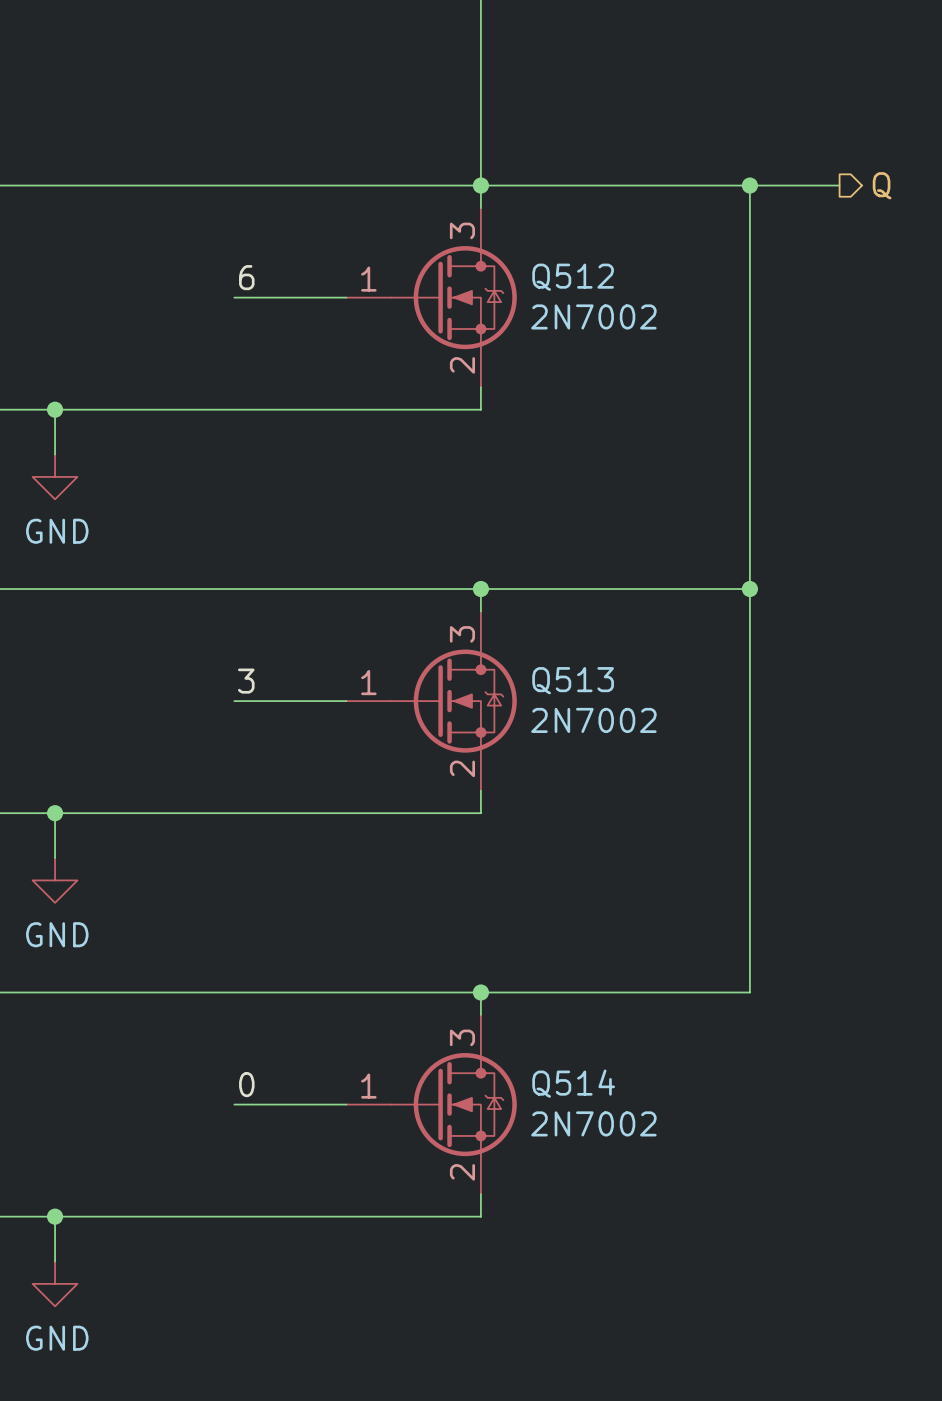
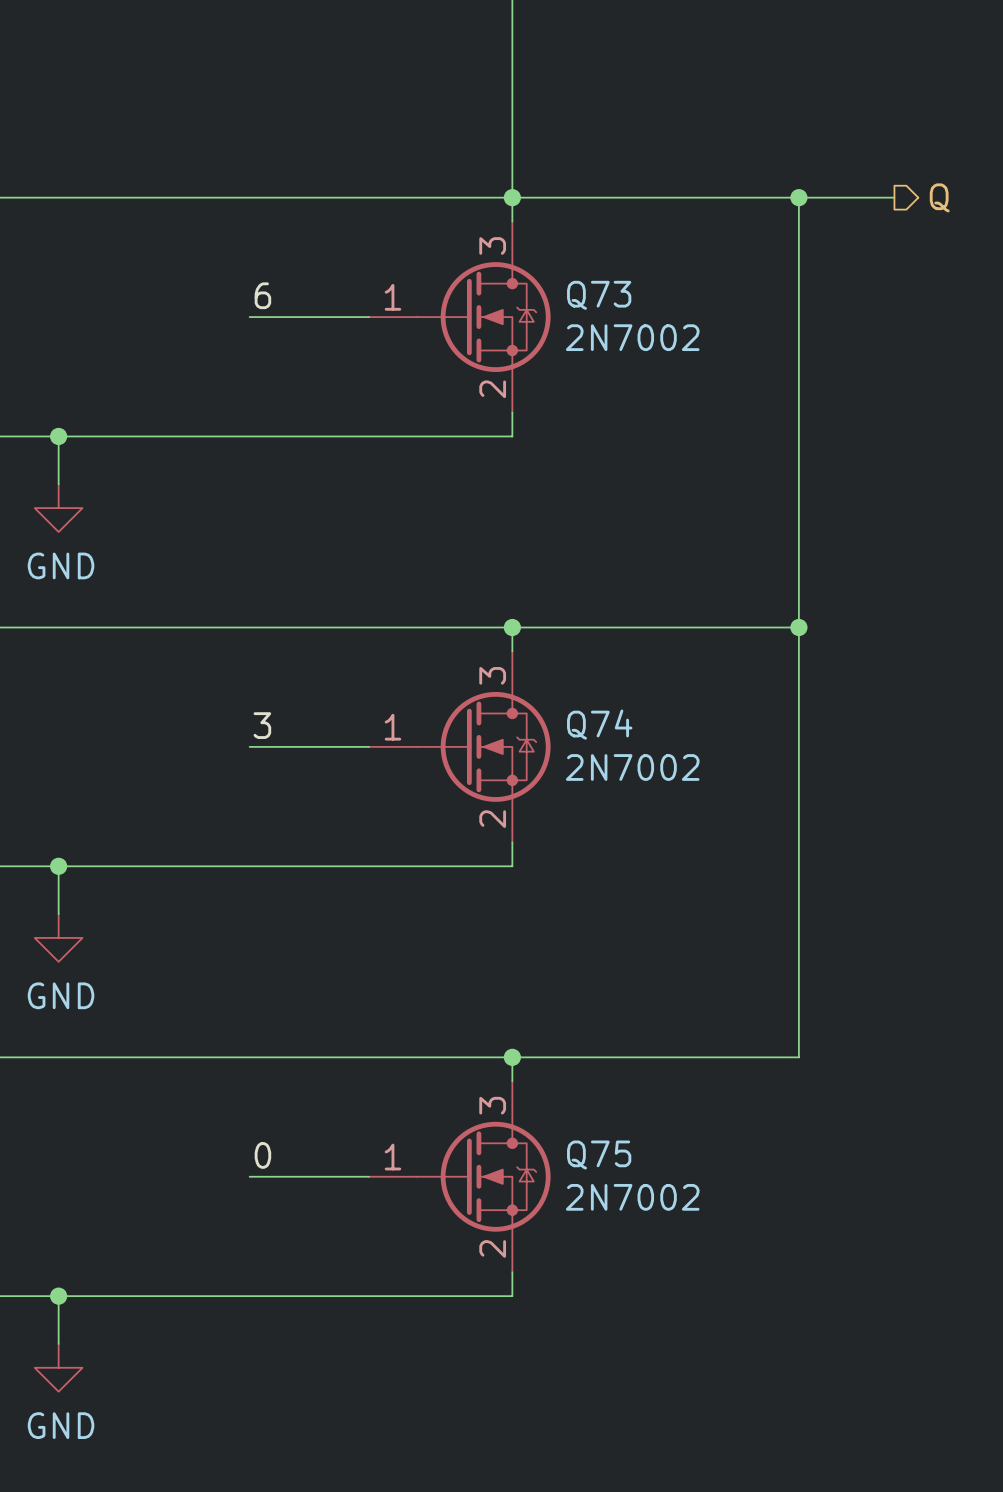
Q512 name: Q512 (573, 277) -> Q73 (599, 295)
Q513 name: Q513 (573, 680) -> Q74 (599, 724)
Q514 name: Q514 (573, 1083) -> Q75 (599, 1155)

